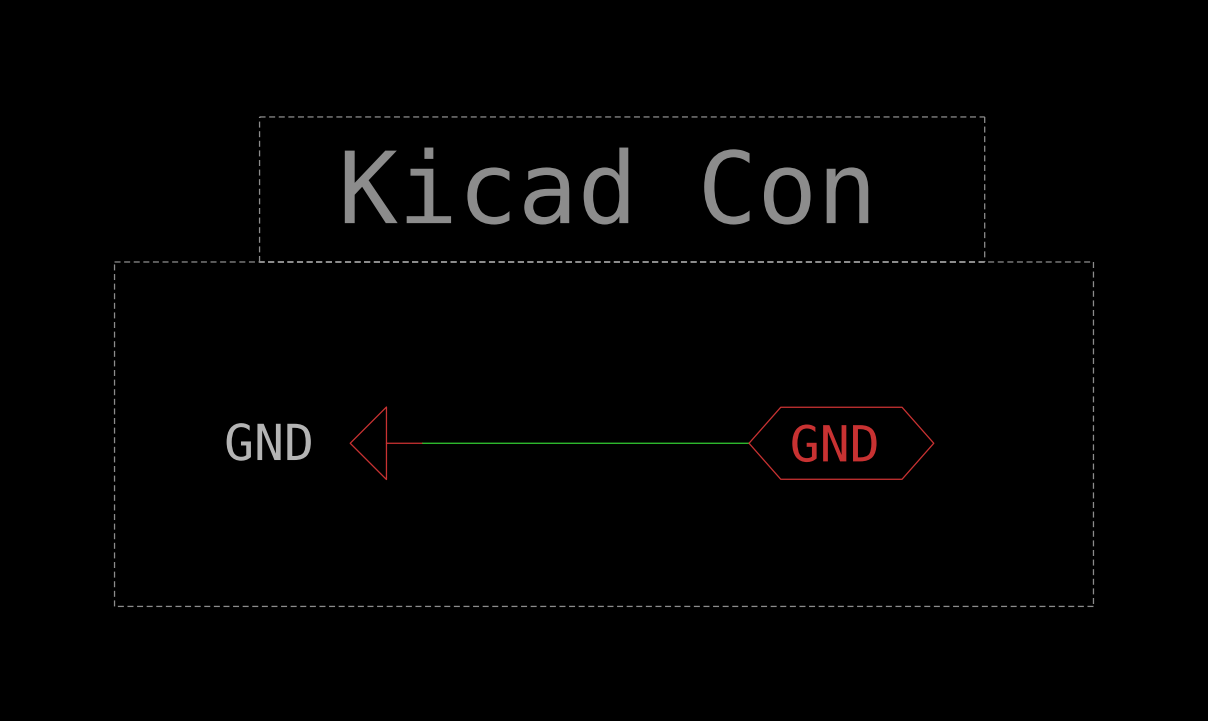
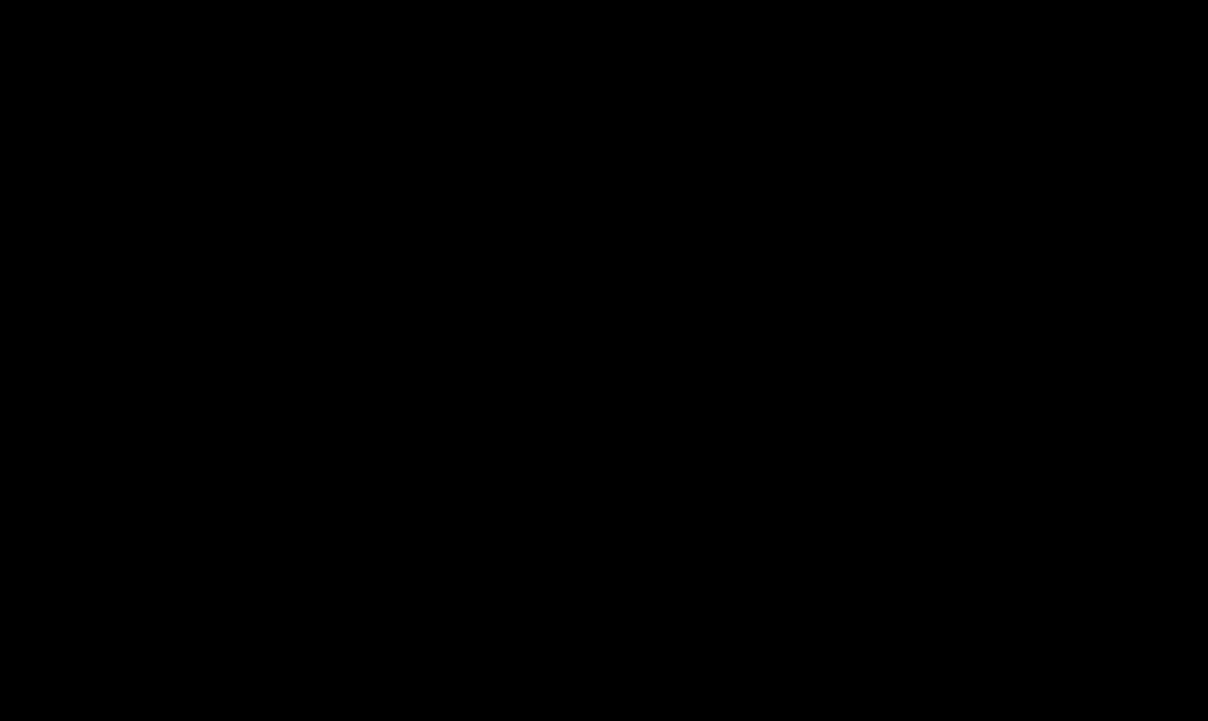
text: Kicad Con (606, 186) -> none
line: (114, 261) (1093, 261) (1093, 606) (114, 606) (114, 261) -> none
line: (259, 261) (259, 116) (984, 116) (984, 261) -> none
power symbol: GND (386, 443) -> none
wire: (422, 443) (749, 443) -> none
global label: GND (834, 443) -> none

